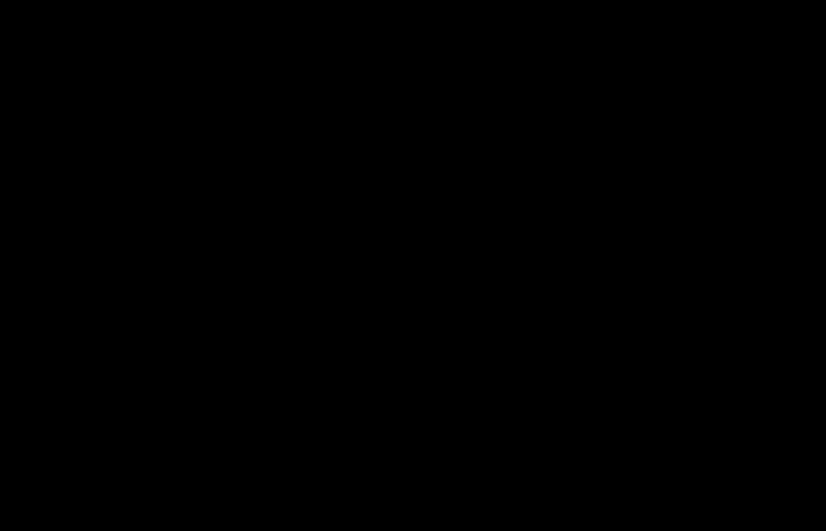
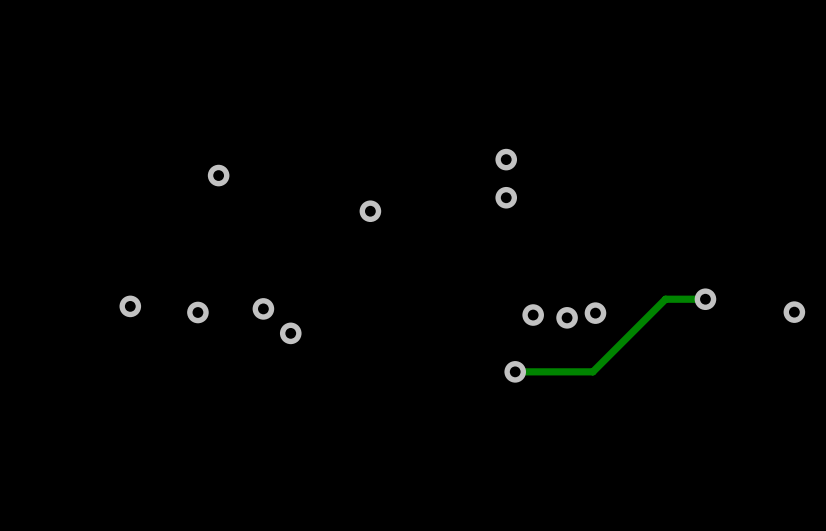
via: none -> (506, 159)
via: none -> (218, 175)
via: none -> (506, 197)
via: none -> (370, 211)
track: none -> (705, 299) (665, 299) (592, 371) (515, 371)
via: none -> (705, 299)
via: none -> (130, 306)
via: none -> (263, 308)
via: none -> (197, 312)
via: none -> (794, 312)
via: none -> (595, 313)
via: none -> (533, 315)
via: none -> (567, 317)
via: none -> (290, 333)
via: none -> (515, 371)

